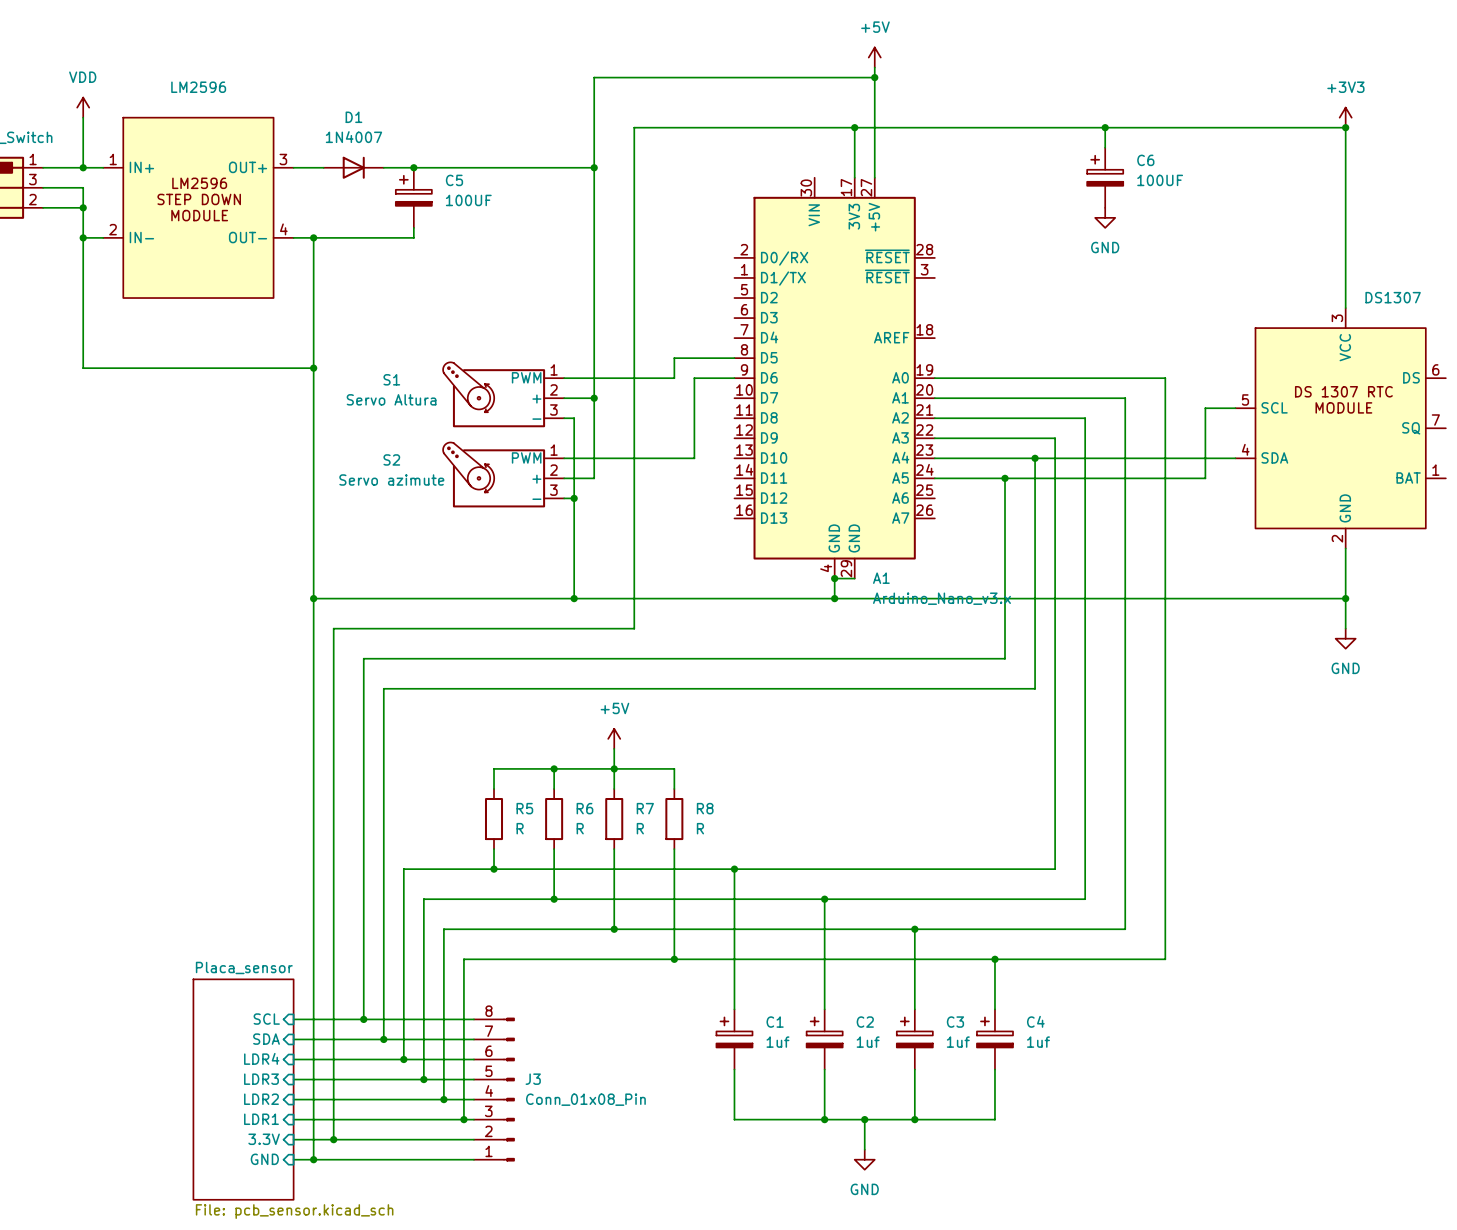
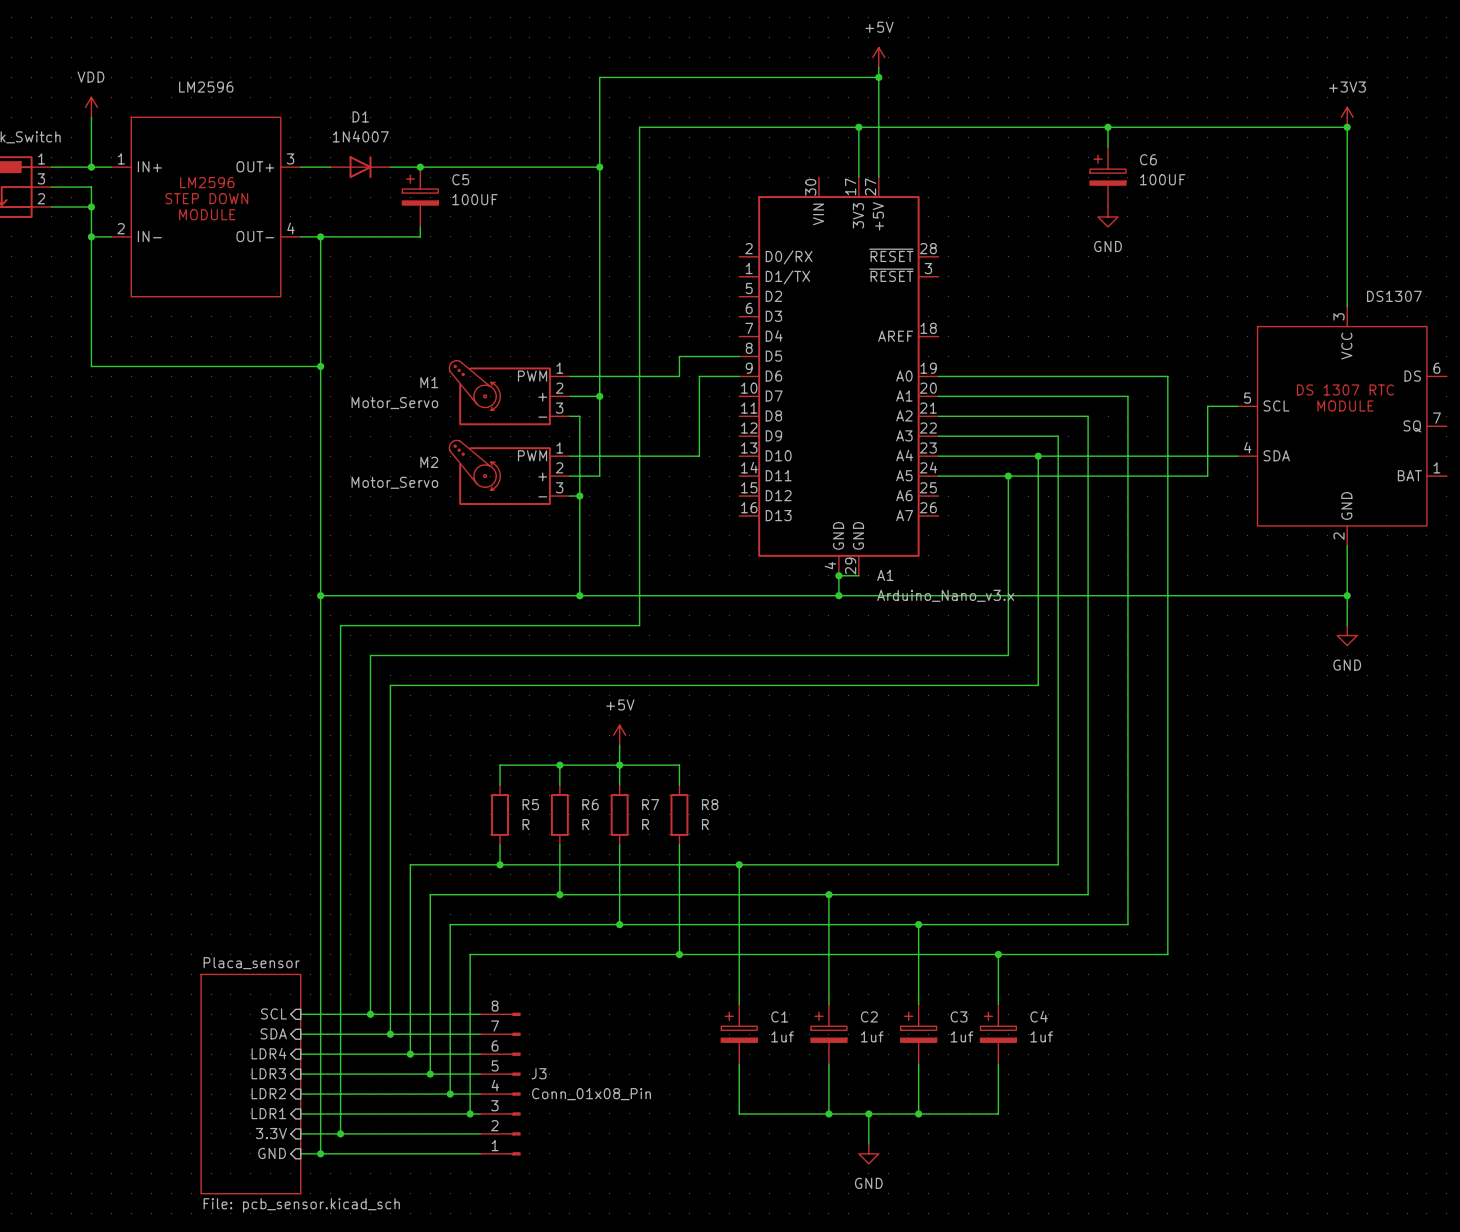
S1 name: S1 (391, 379) -> M1 (429, 382)
S1 value: Servo Altura (391, 399) -> Motor_Servo (394, 403)
S2 name: S2 (391, 459) -> M2 (429, 462)
S2 value: Servo azimute (391, 480) -> Motor_Servo (394, 482)

